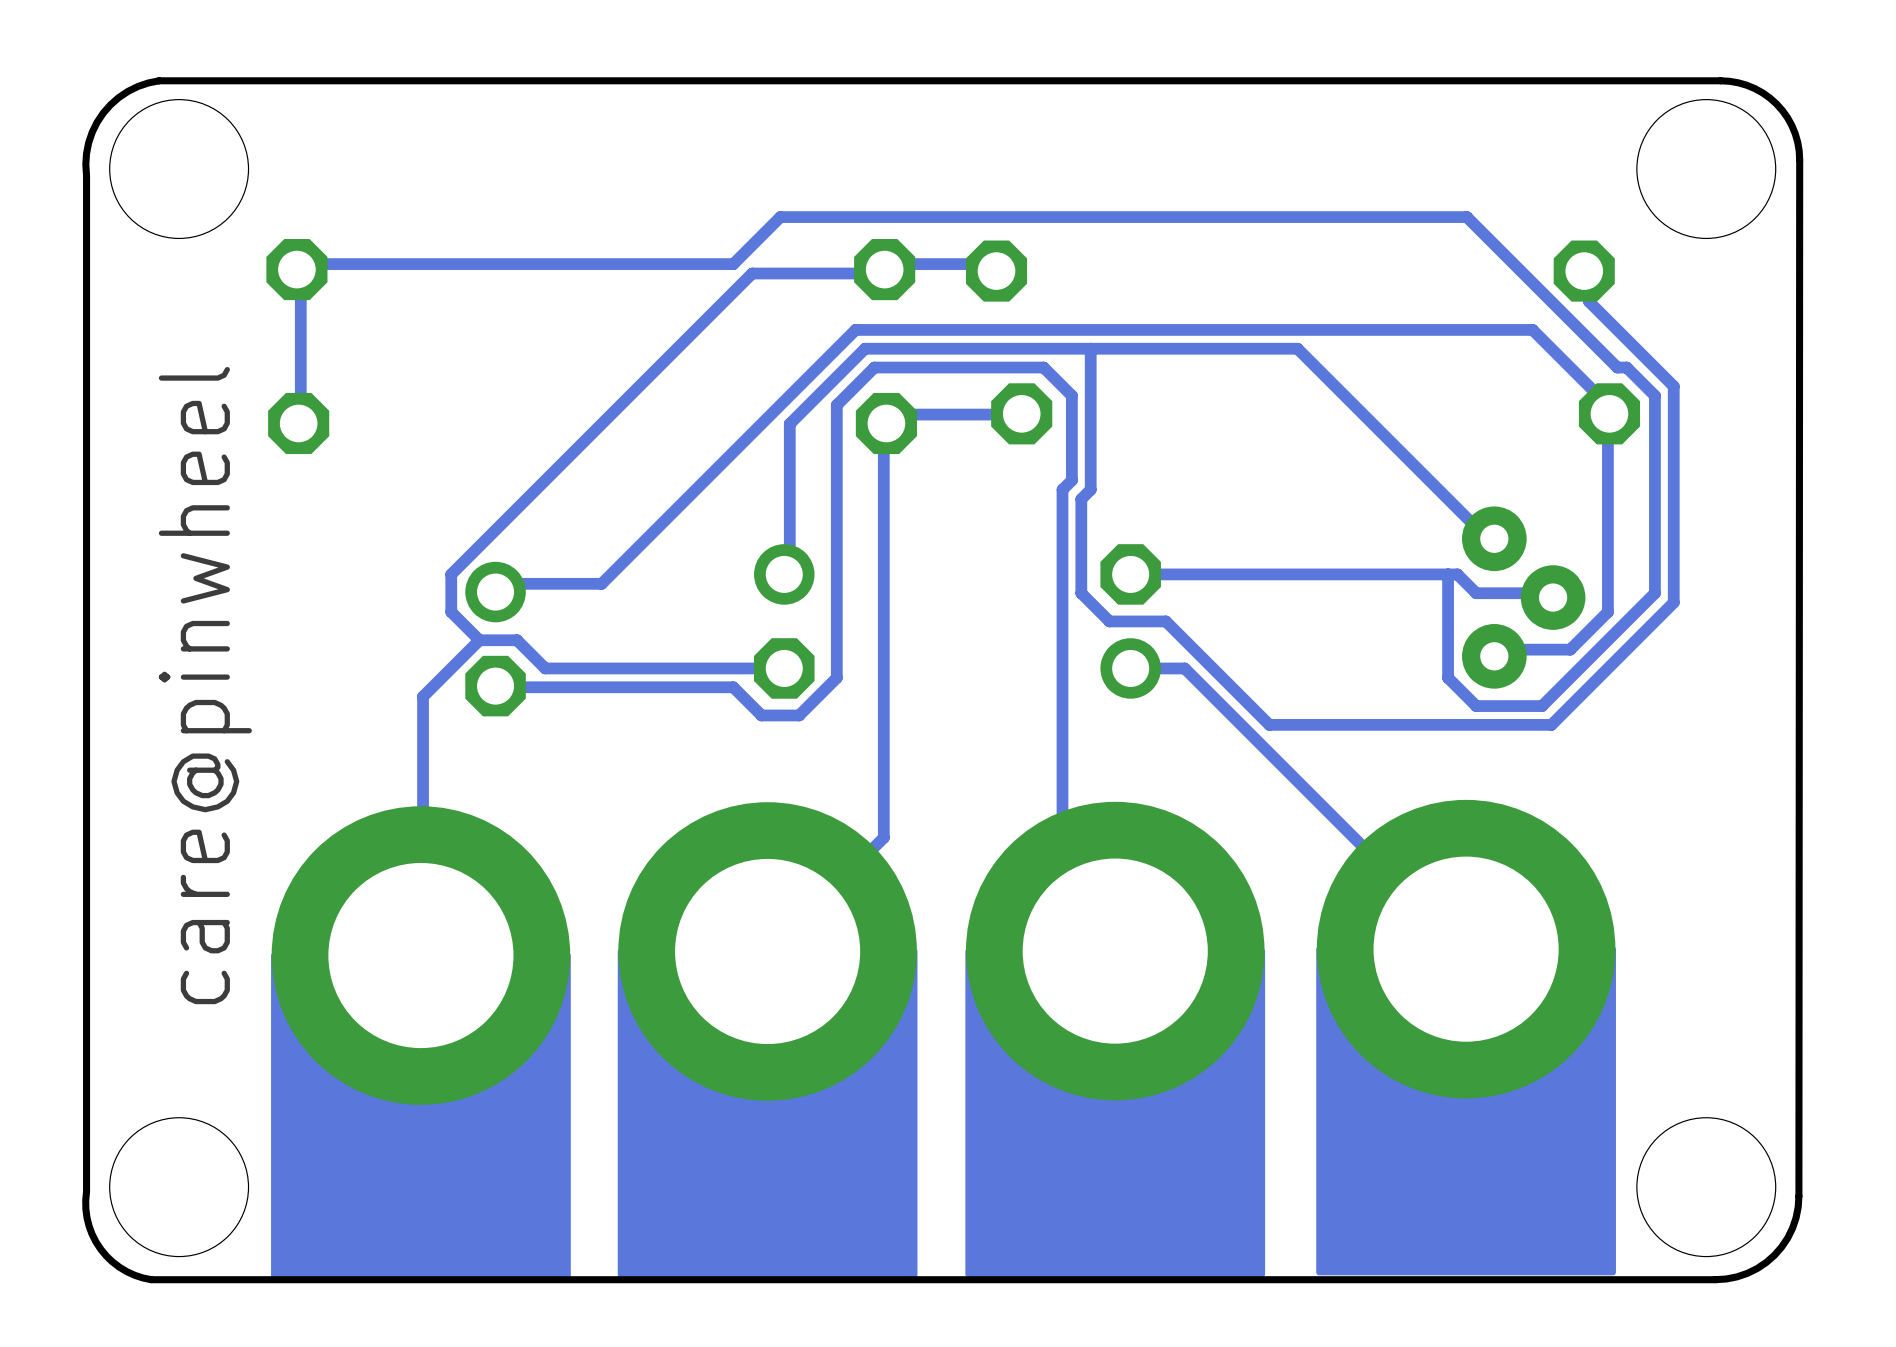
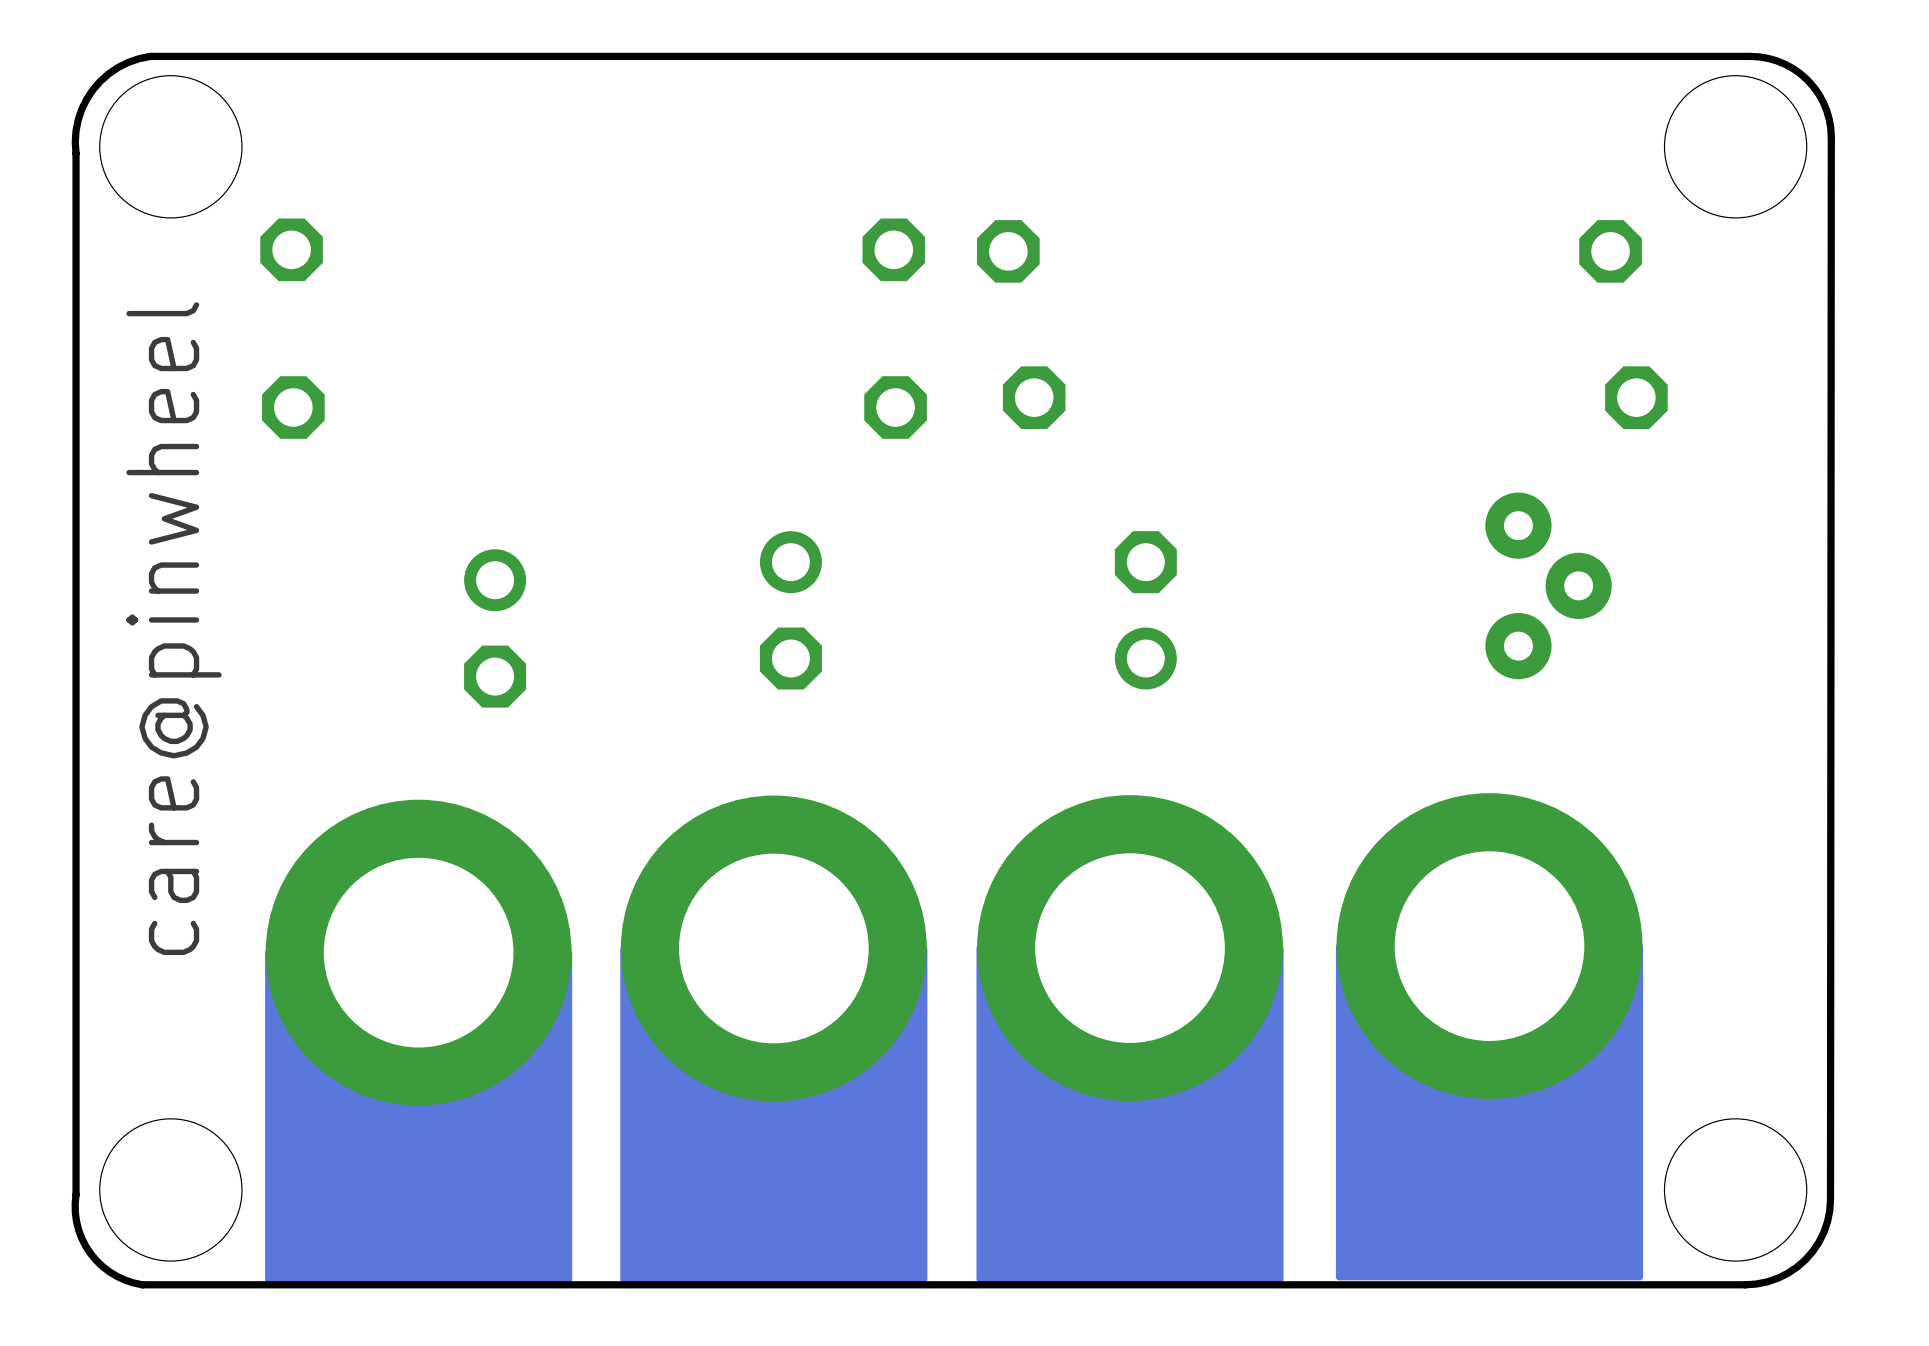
track: (996, 271) (987, 264) (893, 264) (884, 269) (883, 273) (752, 273) (451, 574) (451, 612) (479, 640) -> none
track: (1584, 271) (1589, 273) (1589, 301) (1673, 386) (1673, 602) (1551, 724) (1269, 724) (1165, 621) (1109, 621) (1081, 593) (1081, 499) (1090, 489) (1090, 348) -> none
track: (1021, 413) (893, 414) (883, 423) (883, 837) (770, 950) (767, 951) -> none
track: (298, 423) (300, 414) (300, 273) (296, 269) (300, 264) (733, 264) (780, 217) (1466, 217) (1617, 367) (1626, 367) (1654, 395) (1654, 593) (1542, 706) (1476, 706) (1448, 677) (1448, 574) -> none
track: (1494, 538) (1485, 536) (1297, 348) (865, 348) (789, 423) (789, 574) (784, 574) -> none
track: (1130, 574) (1457, 574) (1476, 593) (1551, 593) (1553, 597) -> none
track: (495, 592) (498, 583) (601, 583) (855, 329) (1532, 329) (1607, 405) (1609, 413) (1607, 414) (1607, 612) (1570, 649) (1495, 649) (1494, 656) -> none
track: (479, 640) (517, 640) (545, 668) (784, 668) -> none
track: (479, 640) (423, 696) (423, 950) (420, 955) -> none
track: (1130, 668) (1184, 668) (1466, 949) -> none
text position: care@pinwheel (205, 685) -> care@pinwheel (174, 628)
track: (495, 686) (733, 687) (761, 715) (799, 715) (836, 677) (836, 405) (874, 367) (1043, 367) (1071, 395) (1071, 480) (1062, 489) (1062, 903) (1109, 950) (1115, 951) -> none

